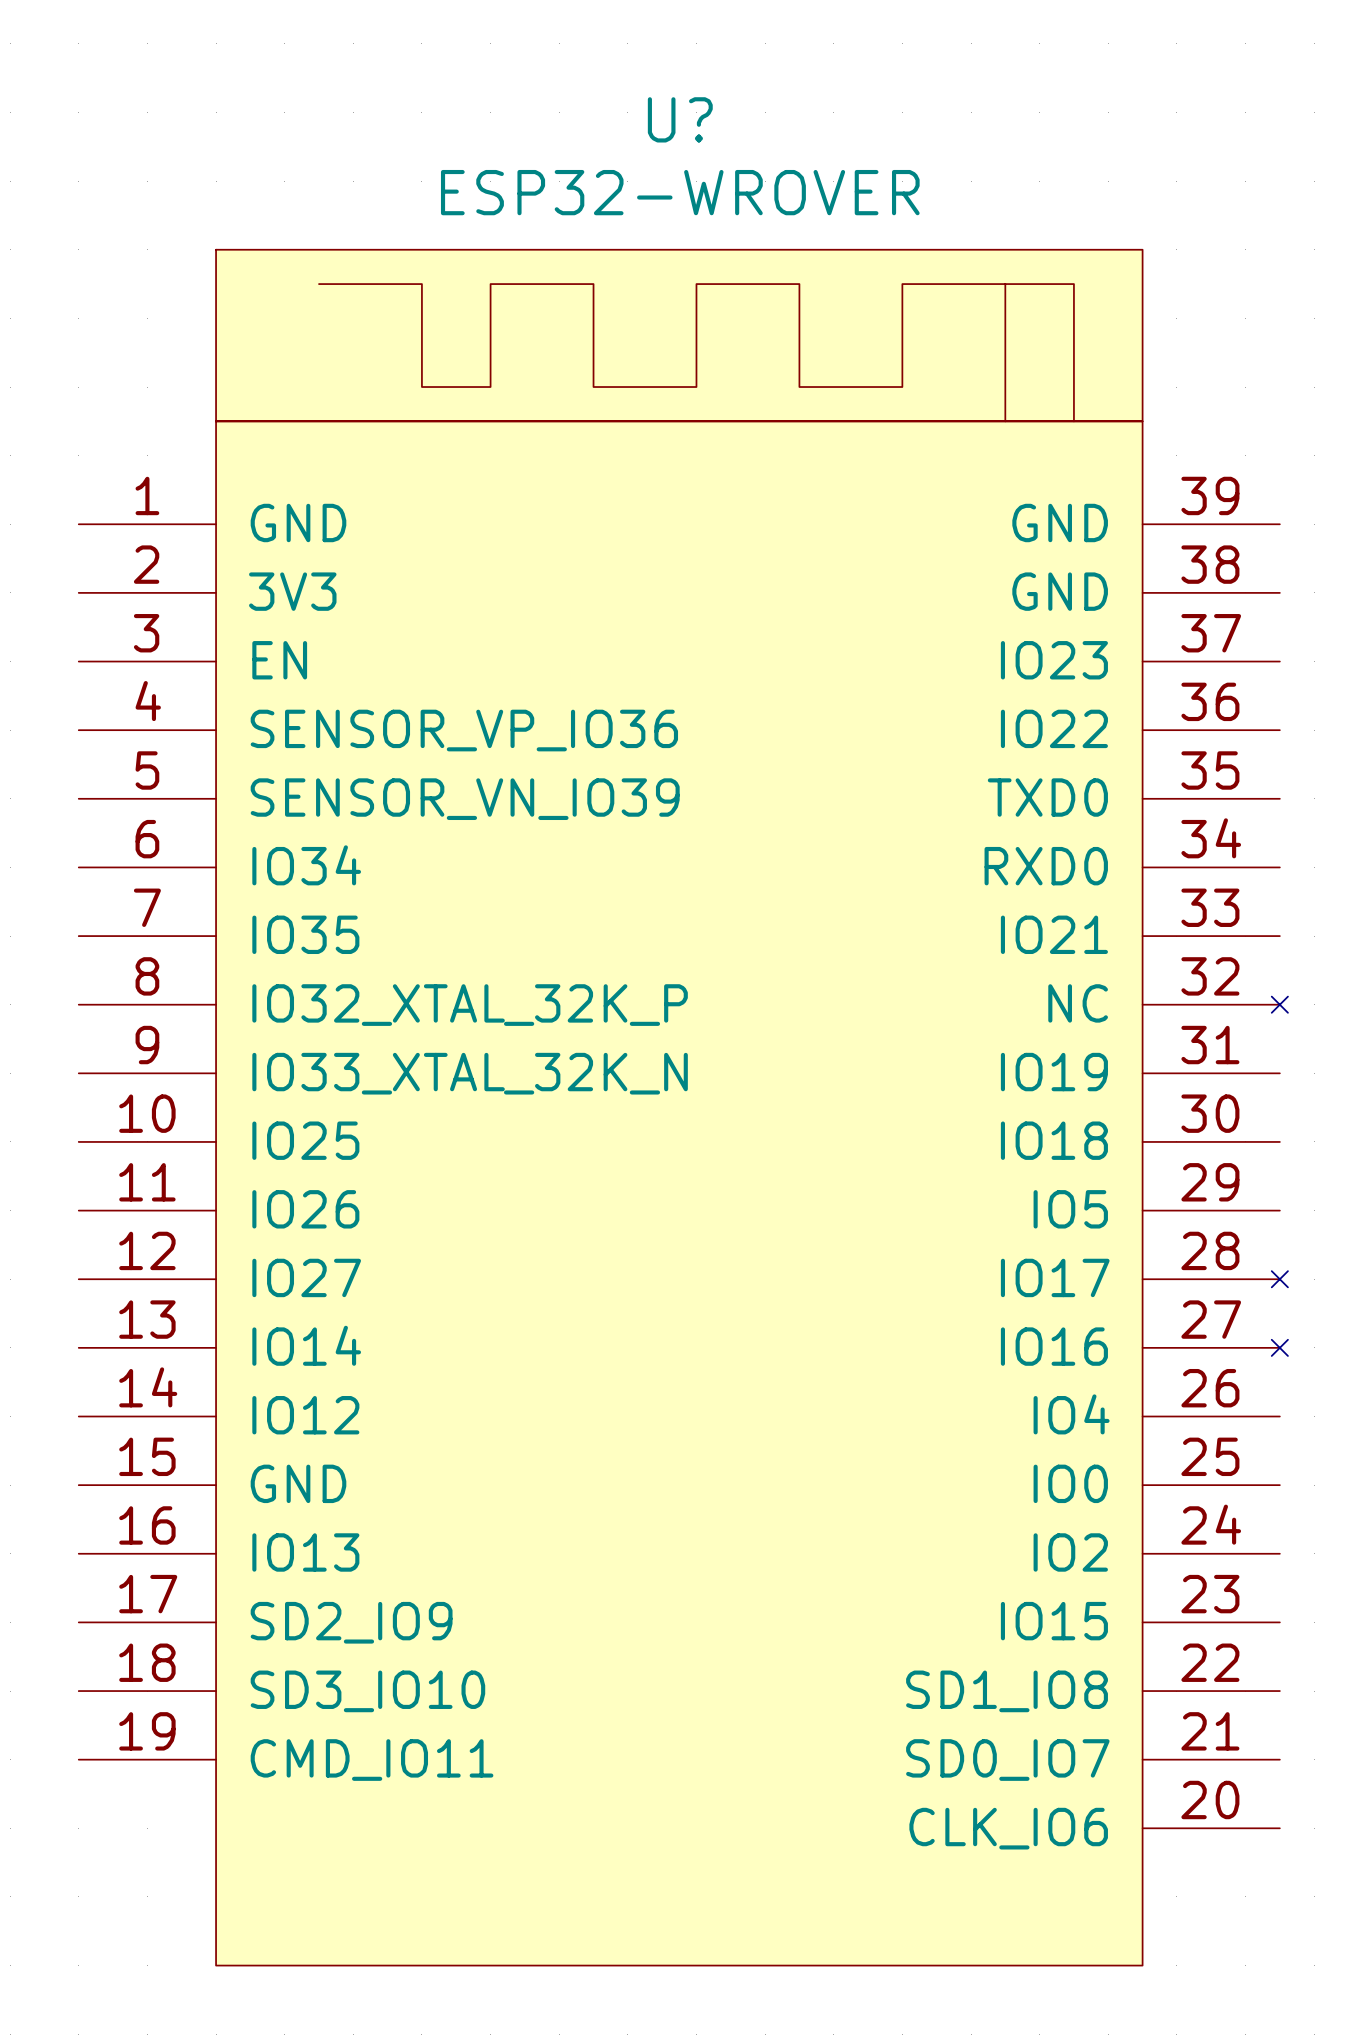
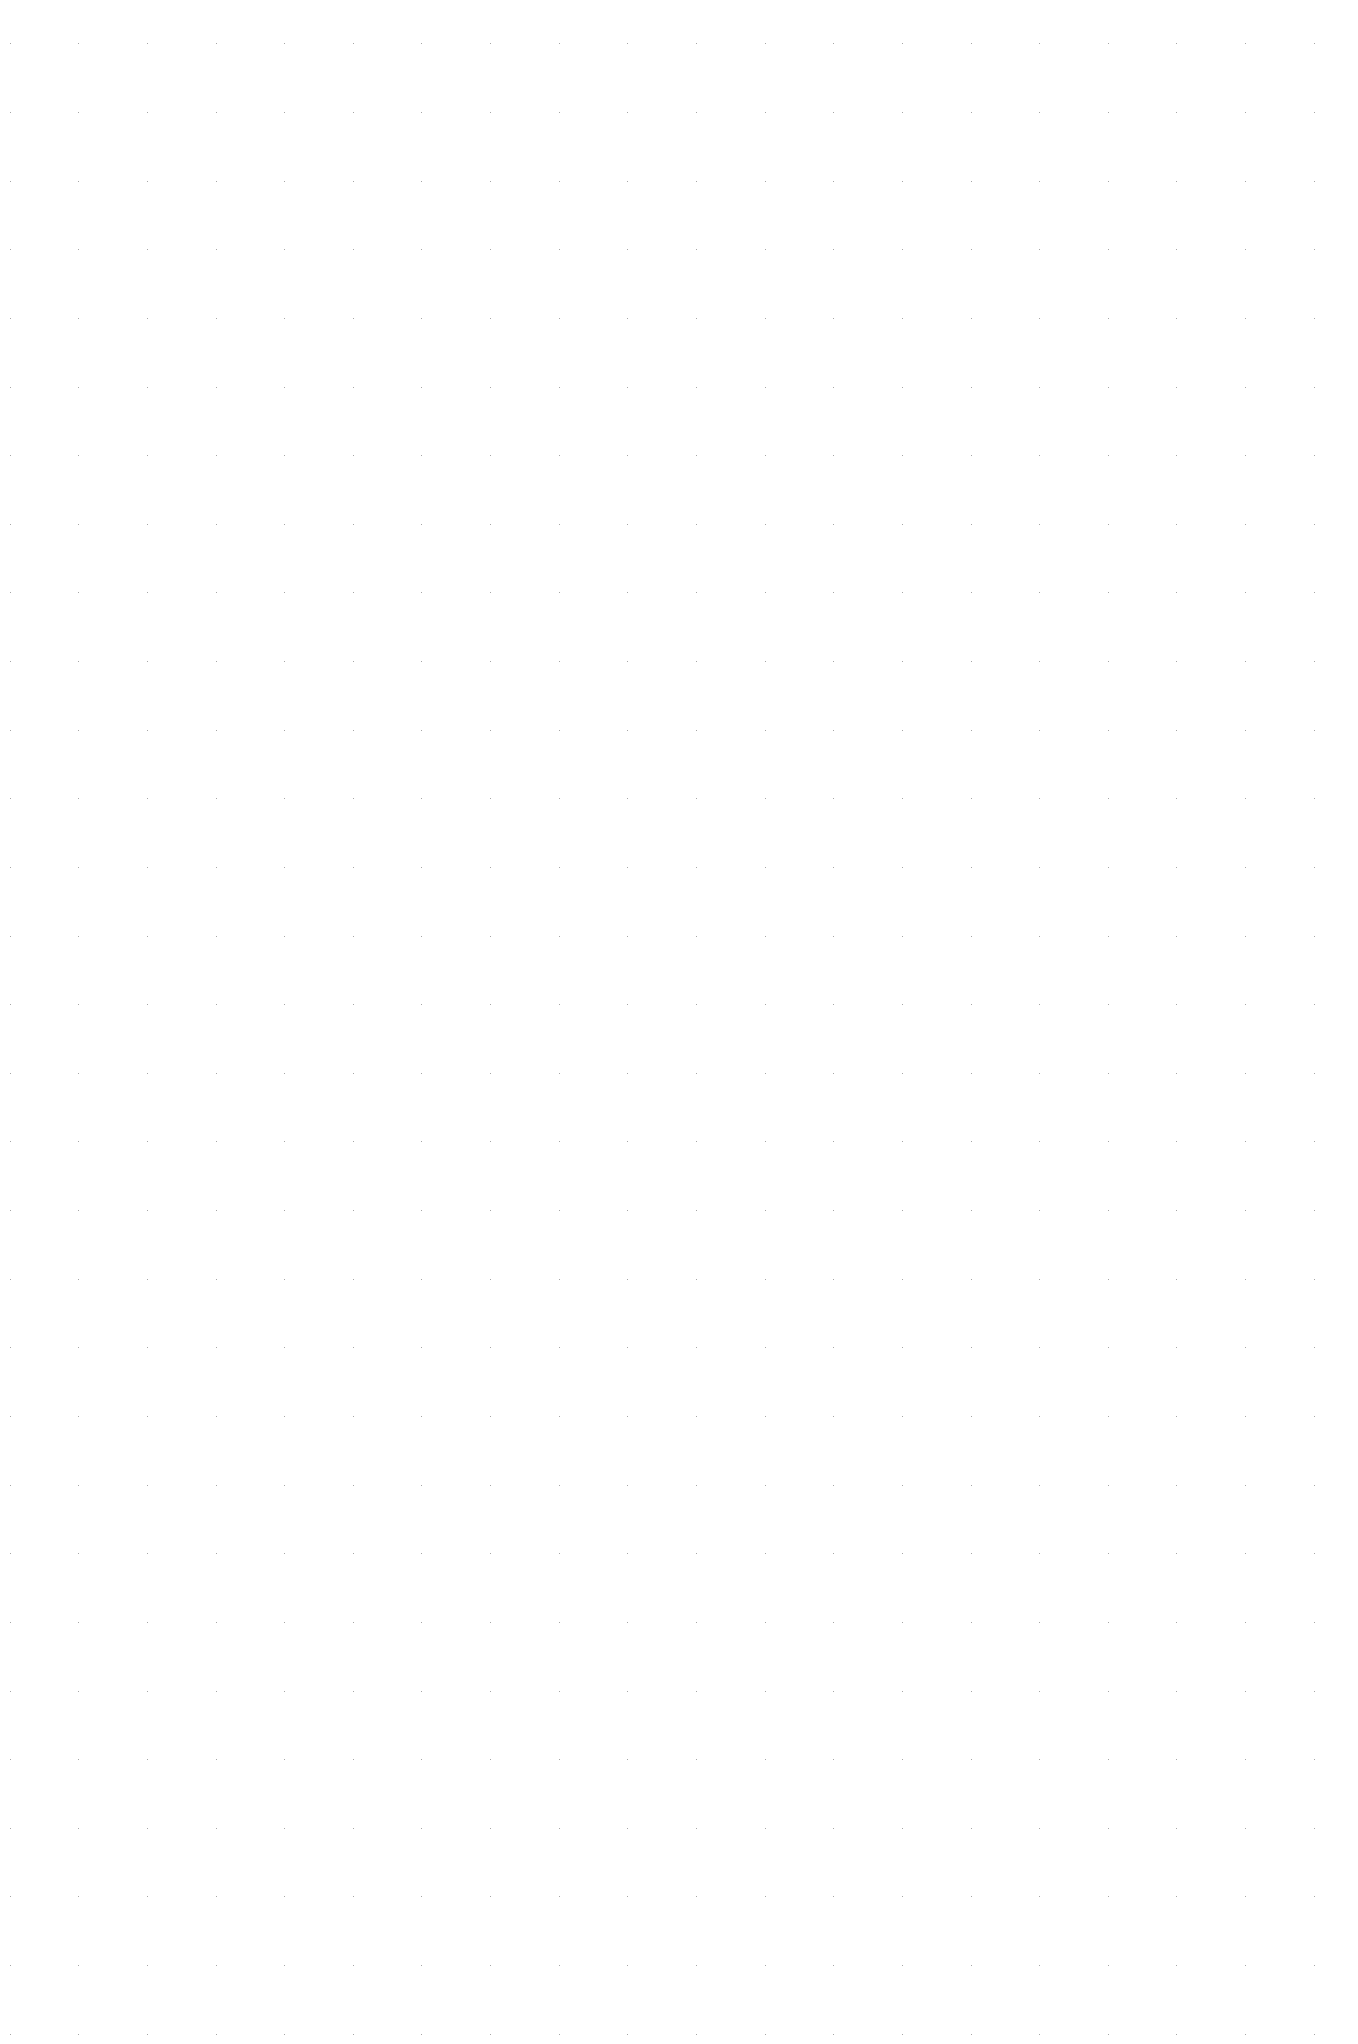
U?: ESP32-WROVER (683, 1107) -> none

